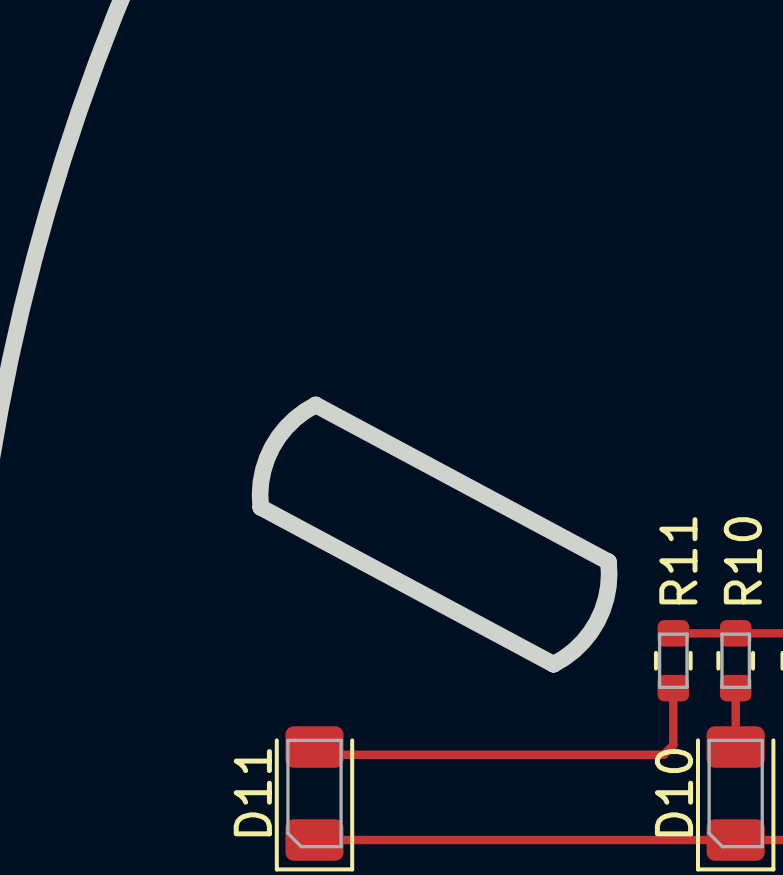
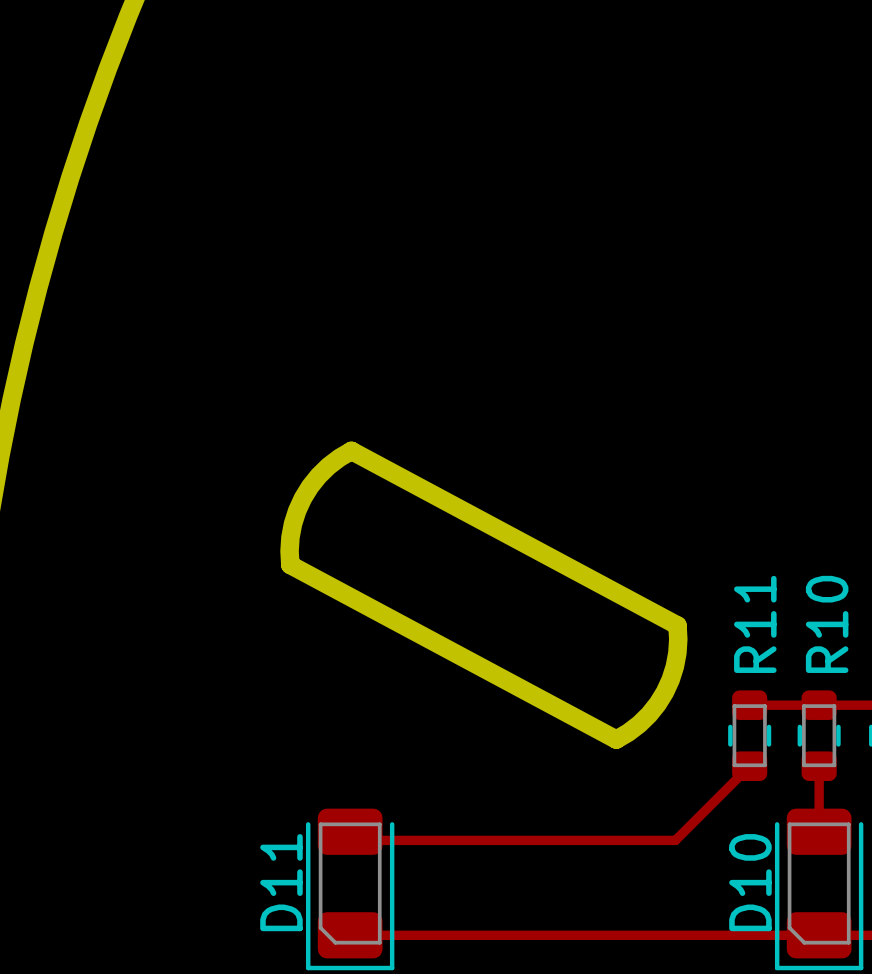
top track: (673, 688) (673, 745) (663, 754) (606, 754) -> (749, 766) (675, 840)

